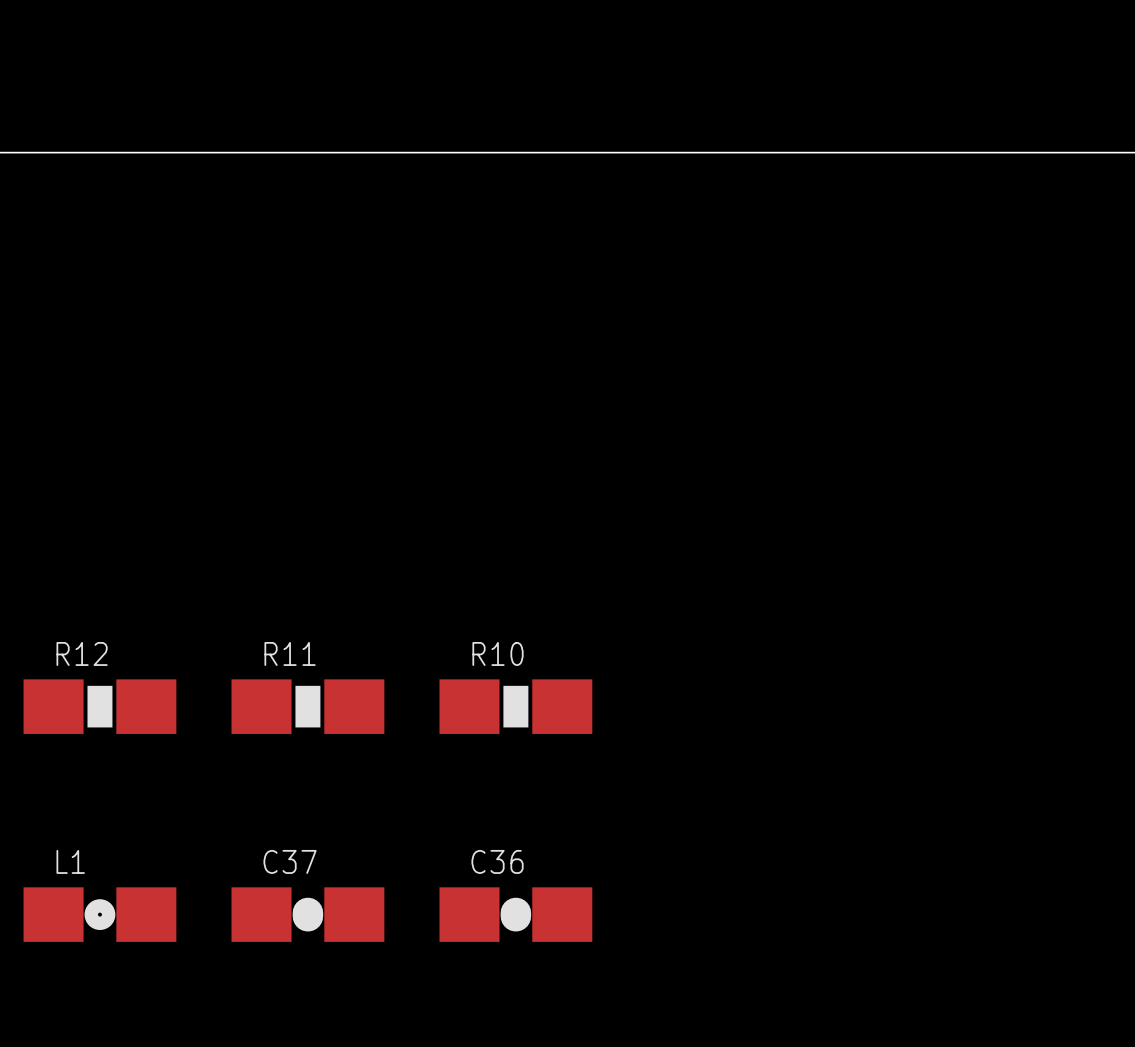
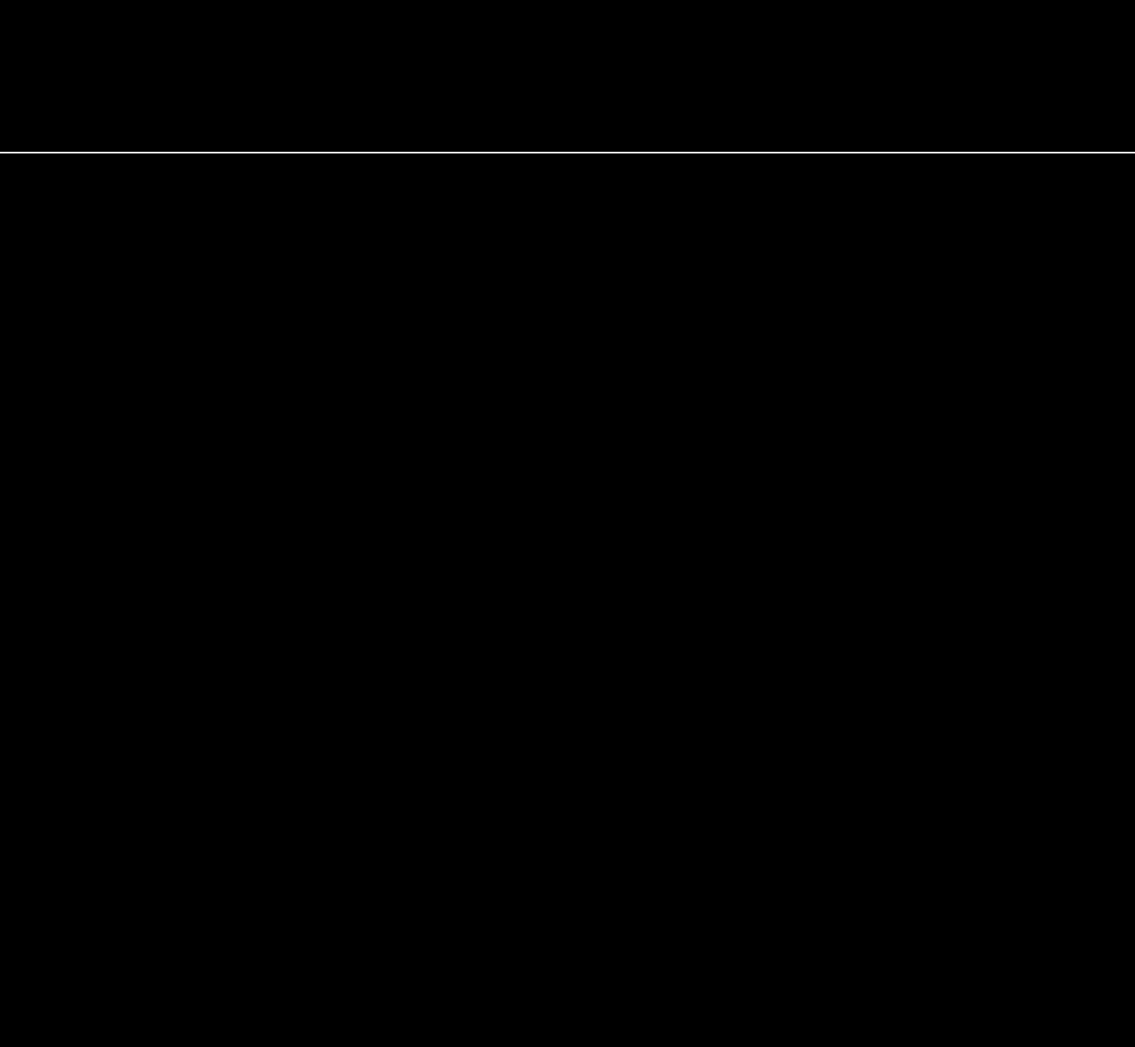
R12: (99, 706) -> none
R11: (307, 706) -> none
R10: (515, 706) -> none
L1: (99, 914) -> none
C37: (307, 914) -> none
C36: (515, 914) -> none

